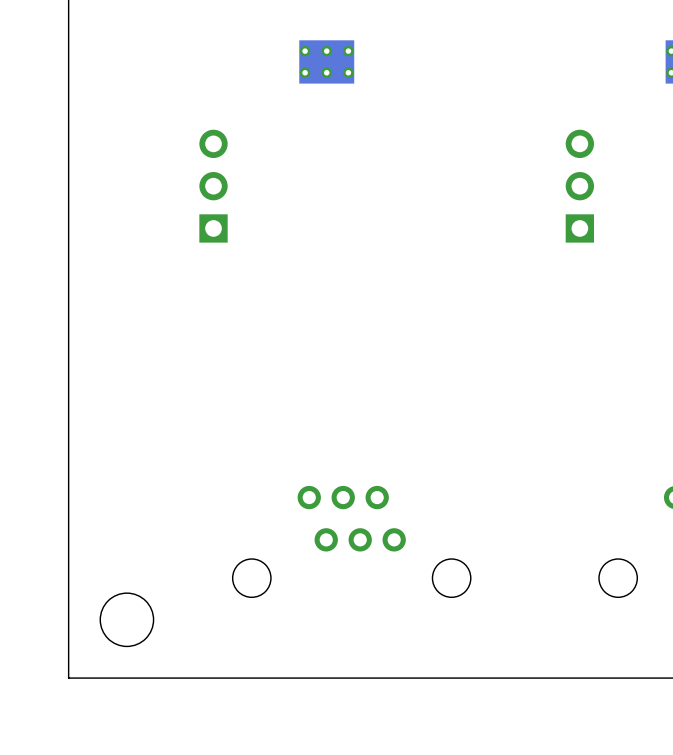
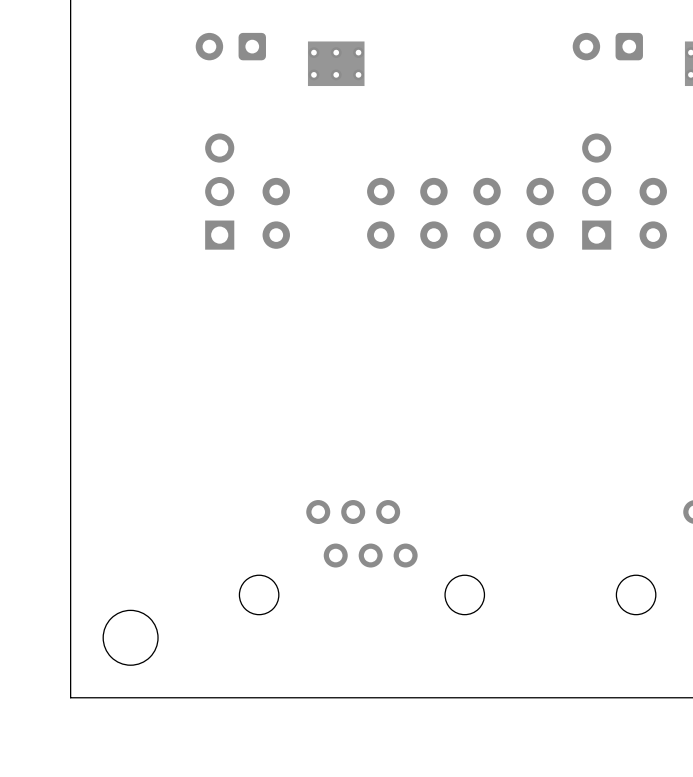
part: none -> (230, 46)
part: none -> (607, 46)
part: none -> (276, 213)
part: none -> (380, 213)
part: none -> (433, 213)
part: none -> (487, 213)
part: none -> (540, 213)
part: none -> (653, 213)

